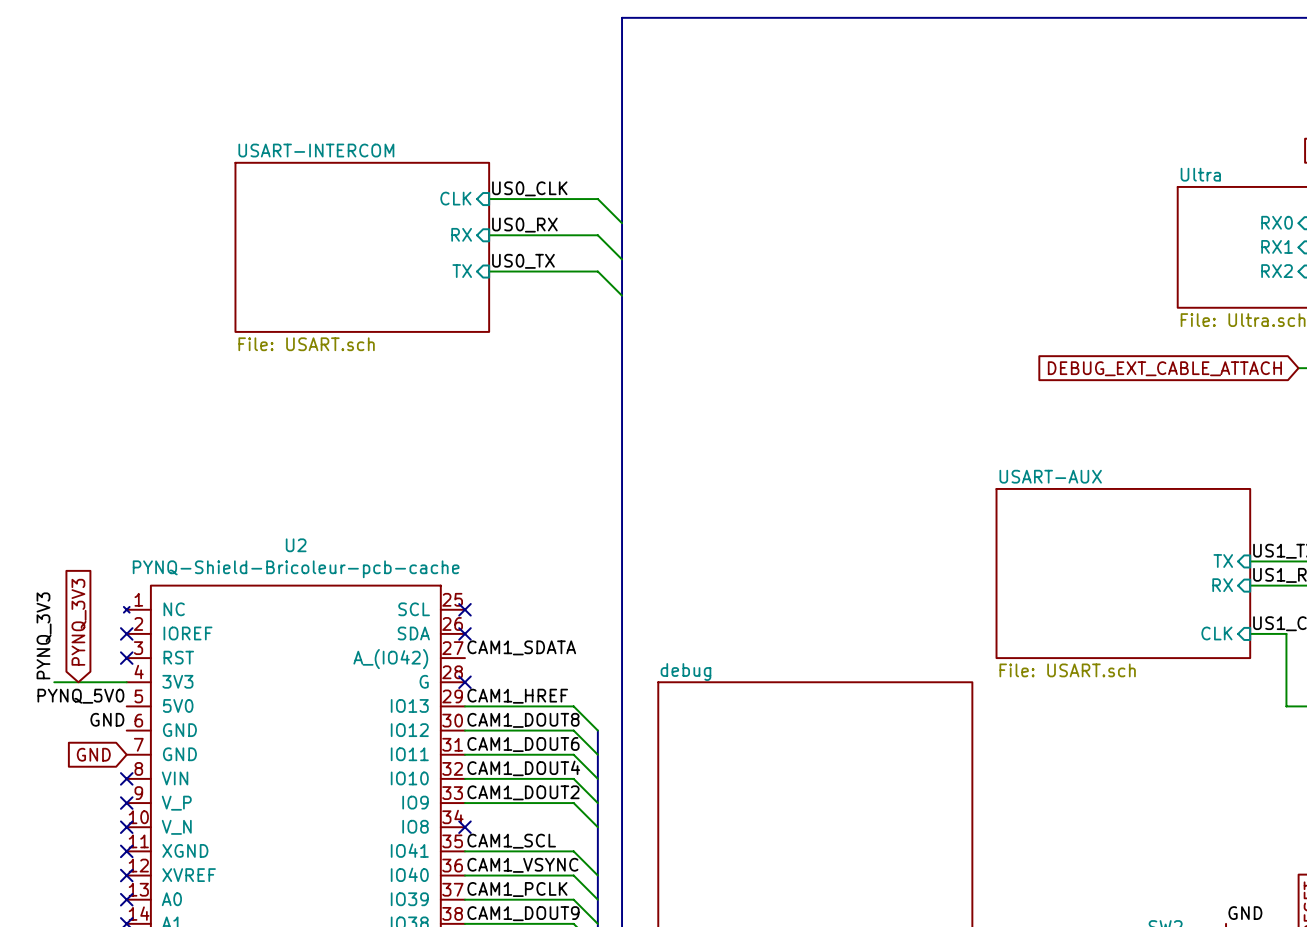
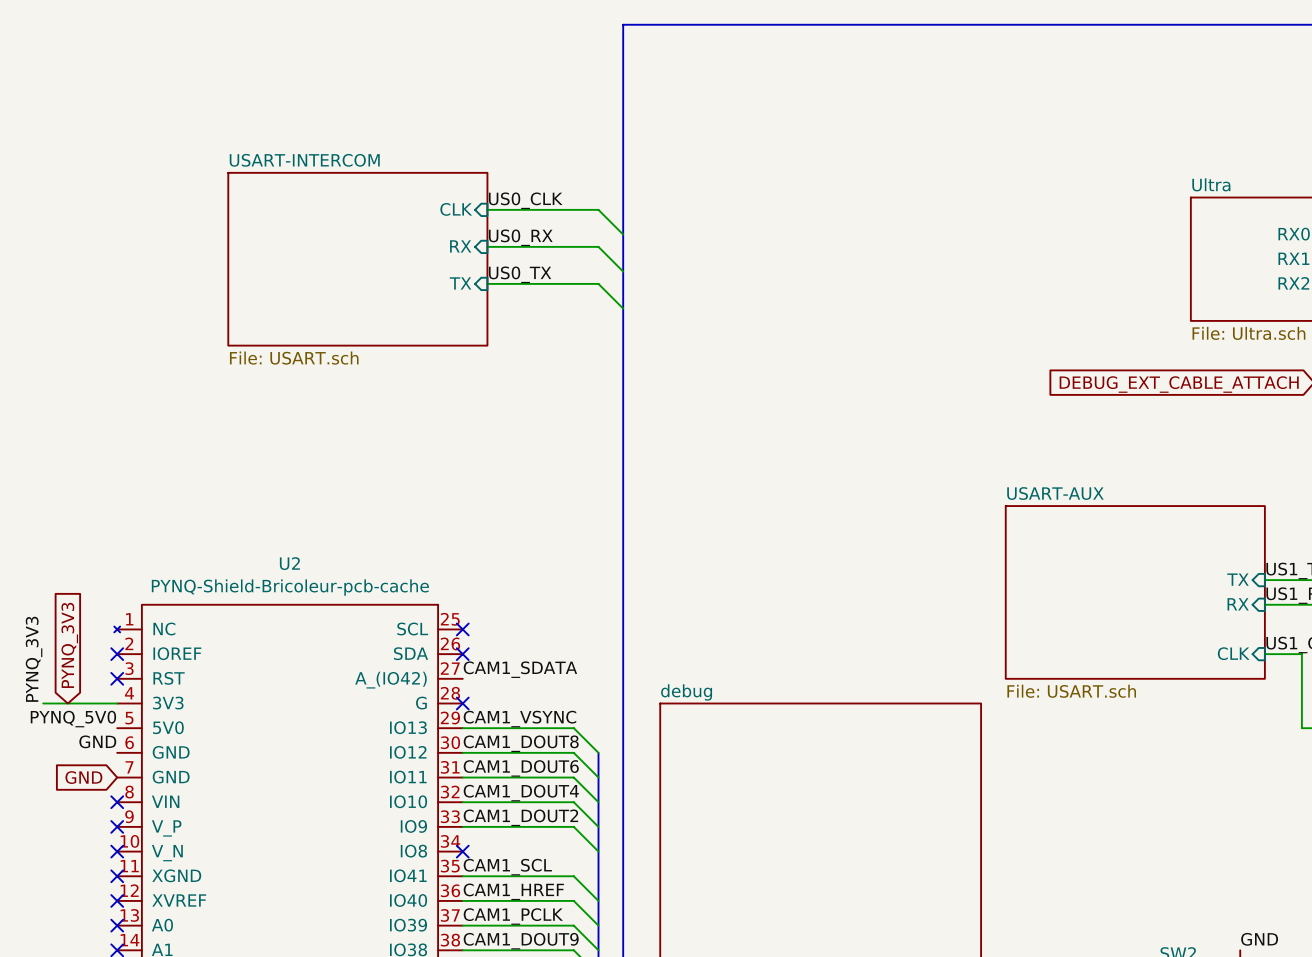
label: CAM1_HREF (517, 696) -> CAM1_VSYNC (519, 719)
label: CAM1_VSYNC (522, 865) -> CAM1_HREF (513, 891)

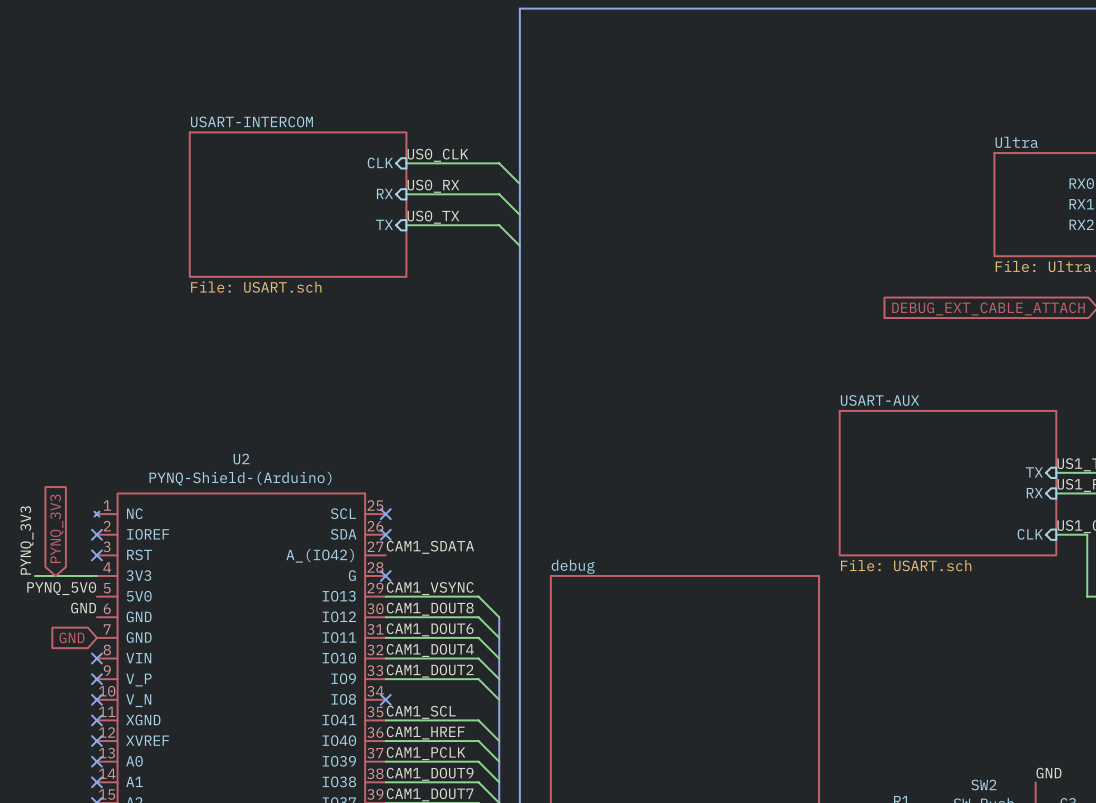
U2 value: PYNQ-Shield-Bricoleur-pcb-cache (290, 587) -> PYNQ-Shield-(Arduino) (240, 478)

